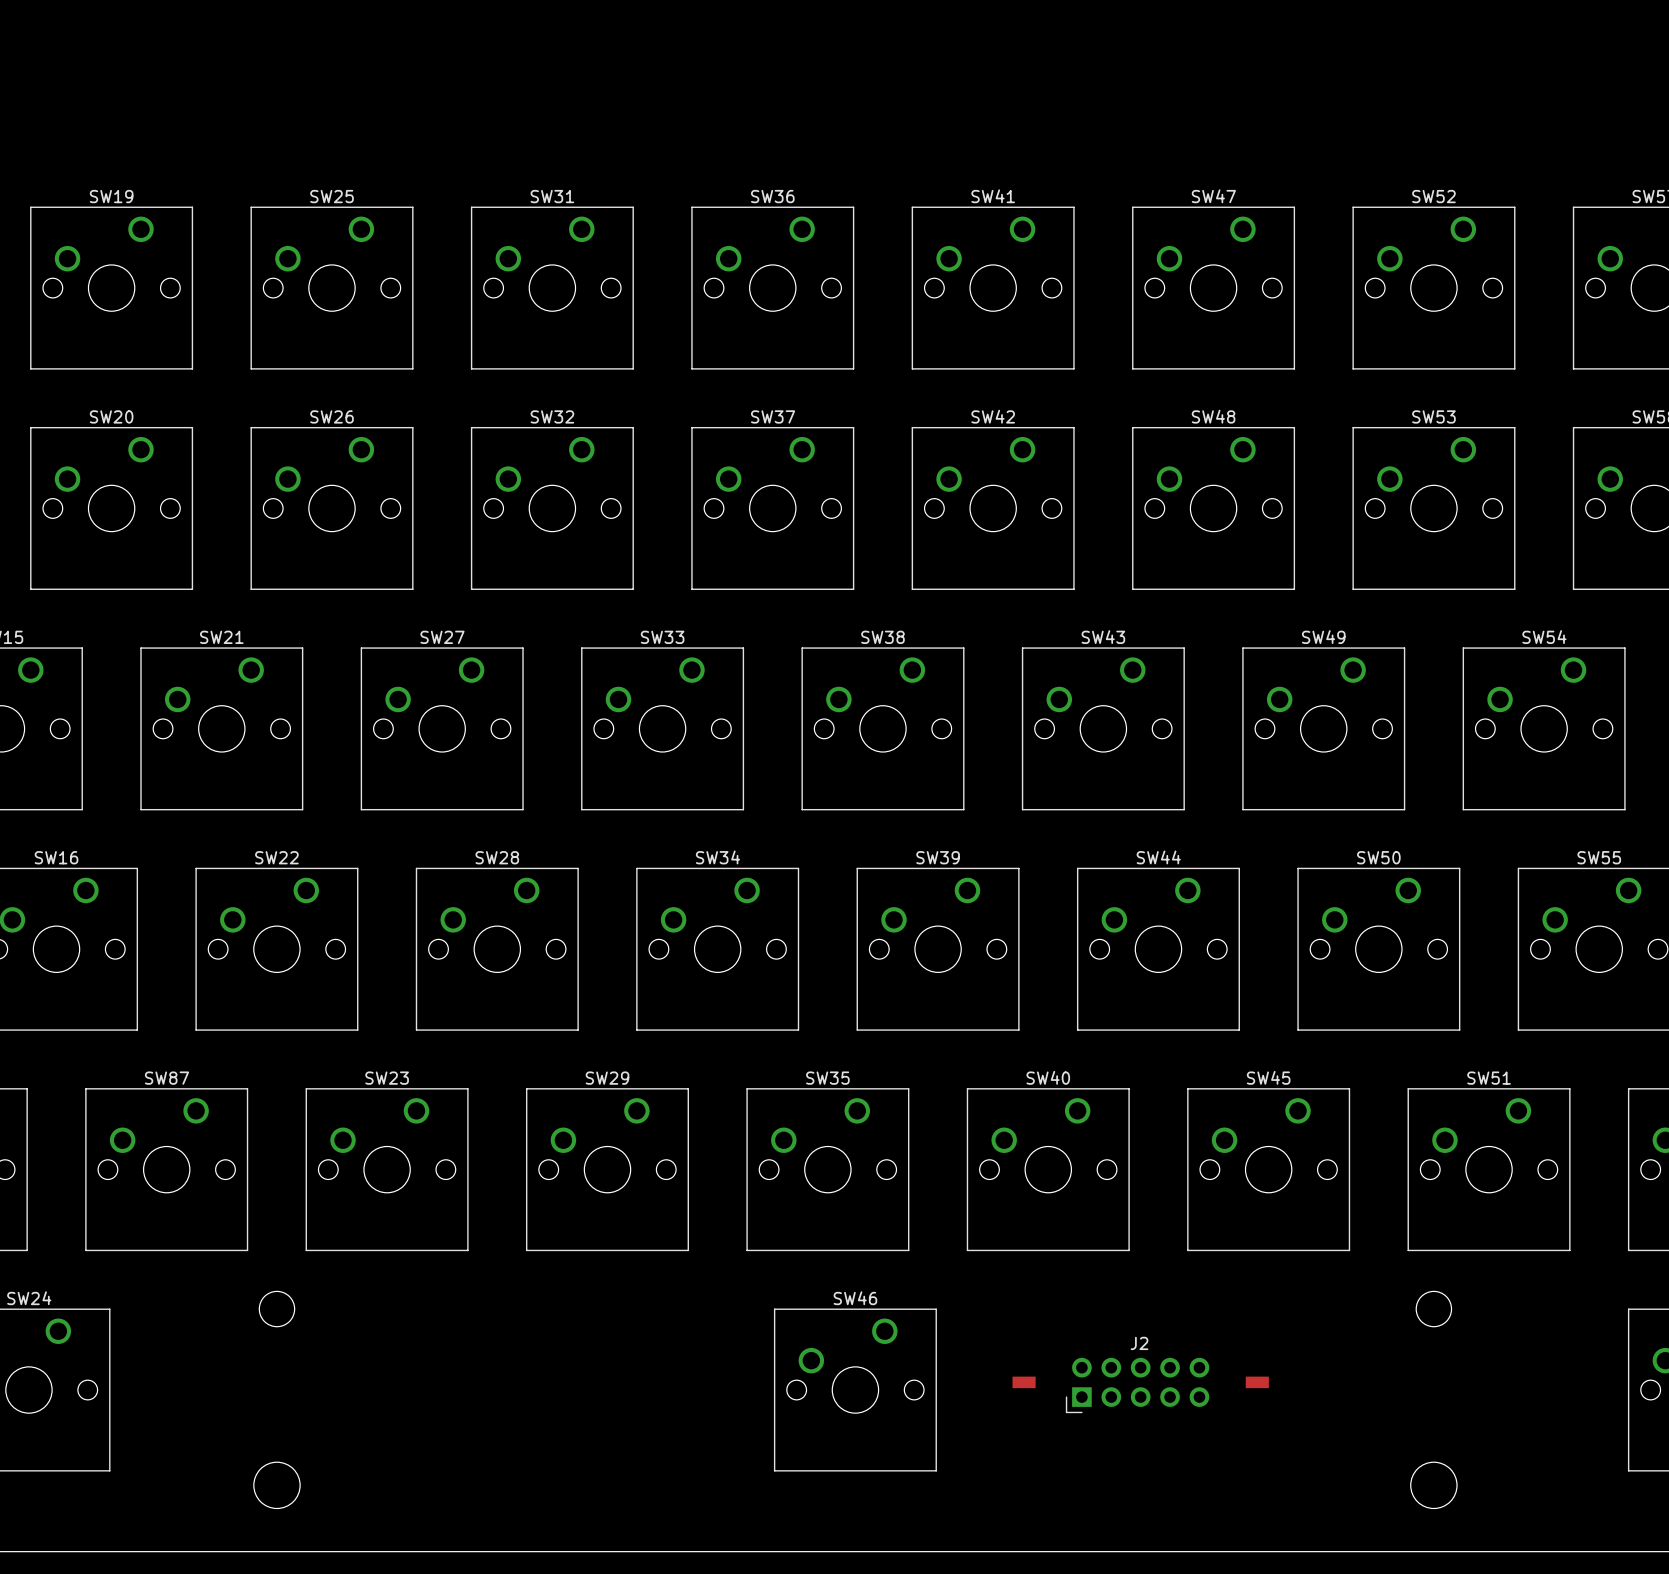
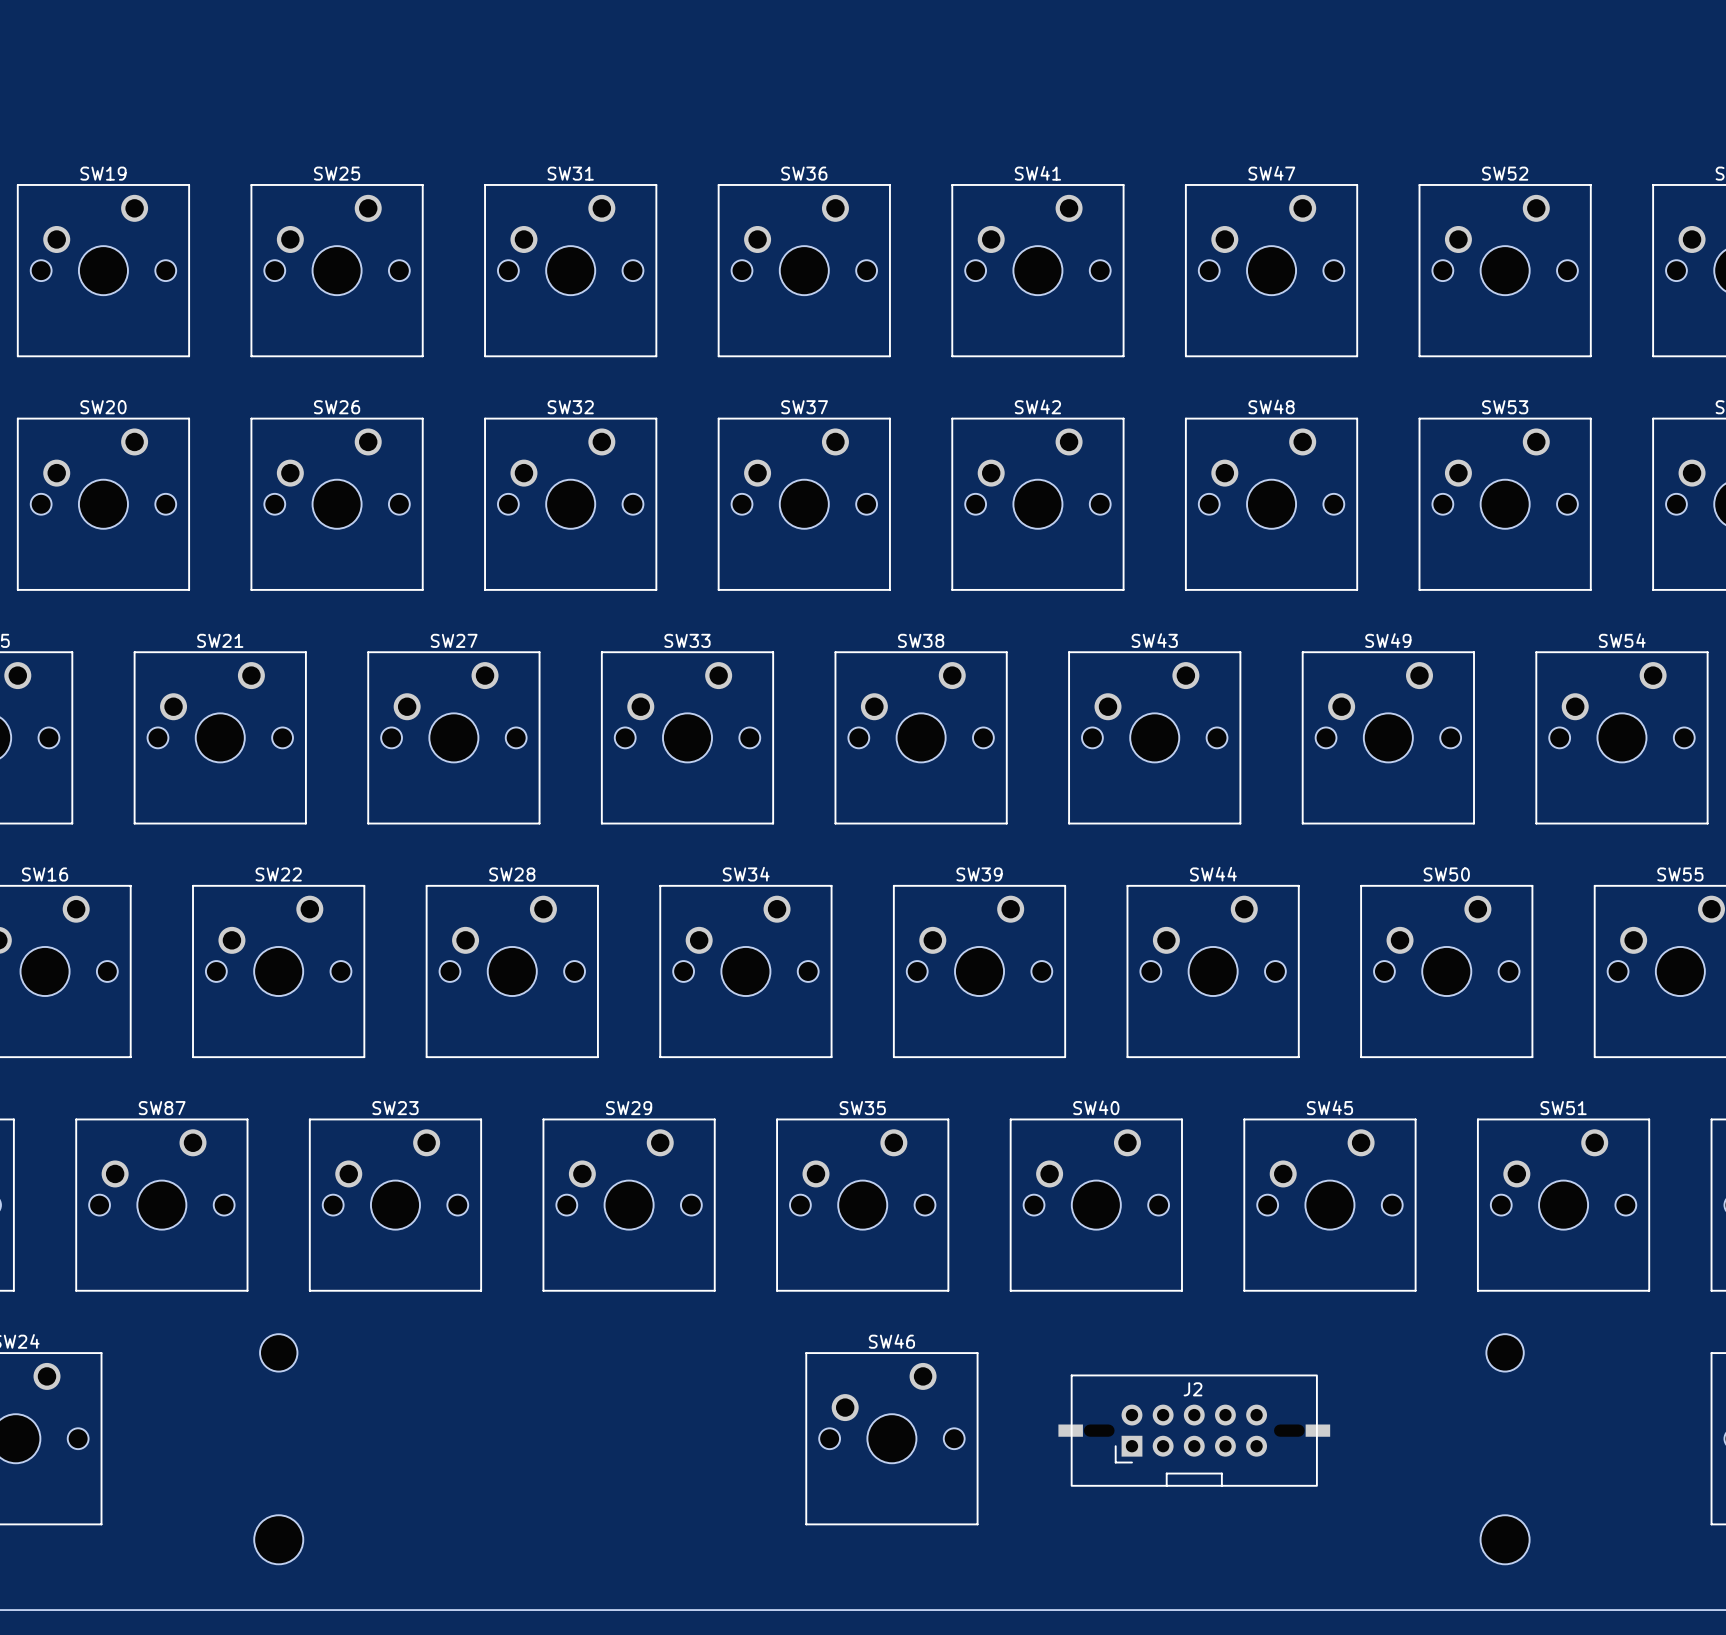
J2 footprint: [1012, 1357, 1269, 1414] -> [1058, 1374, 1331, 1487]

